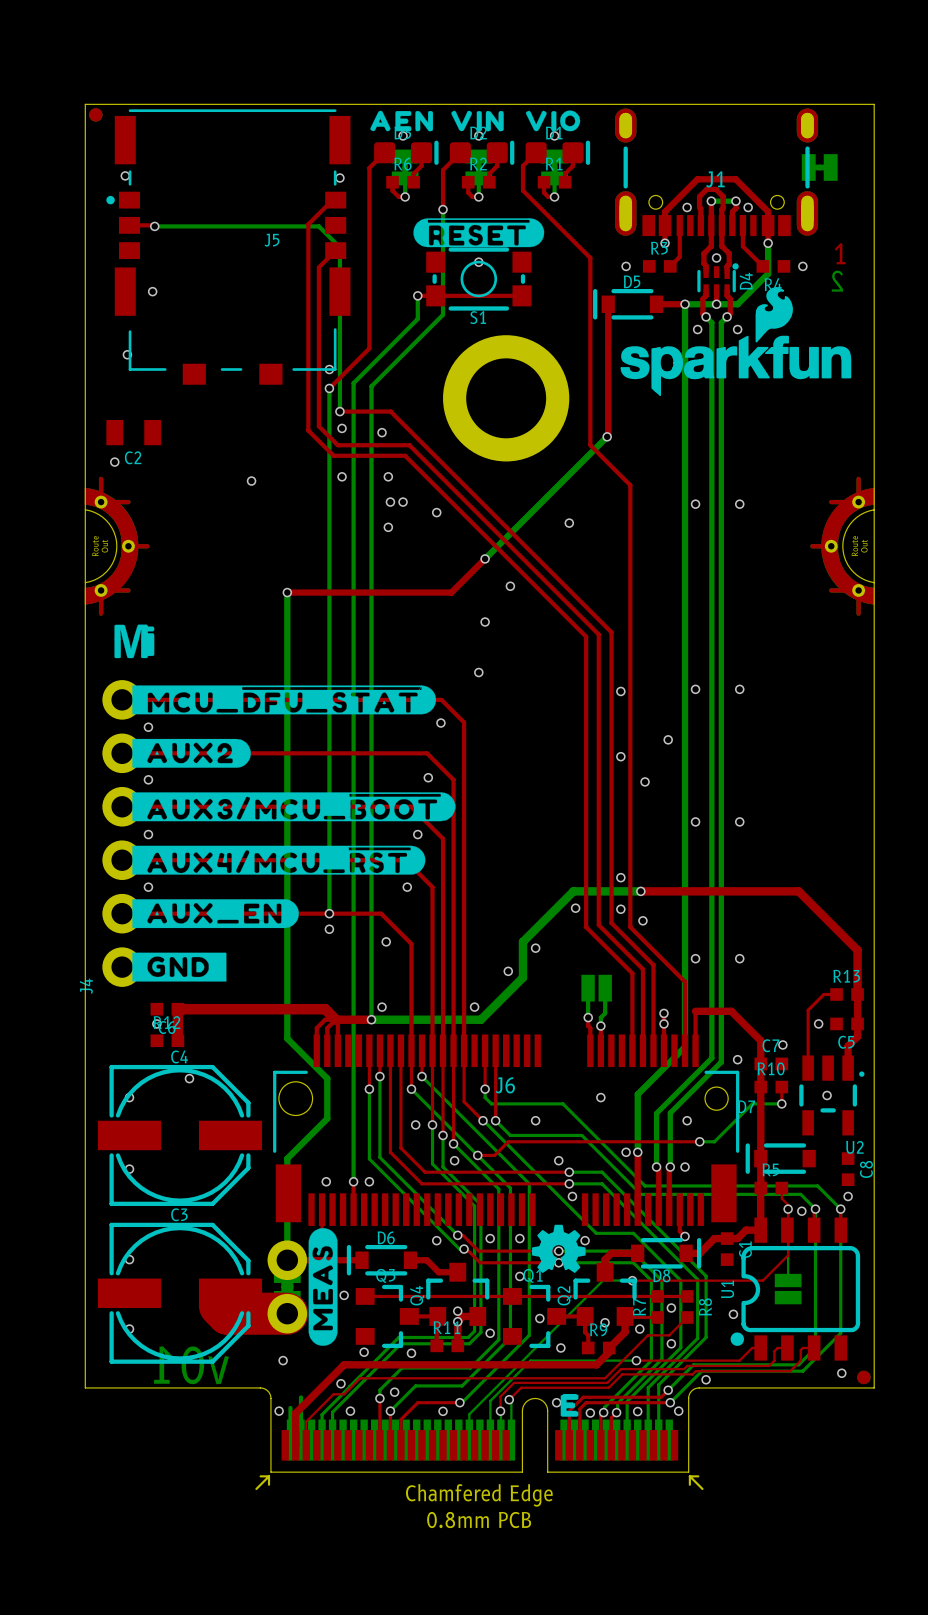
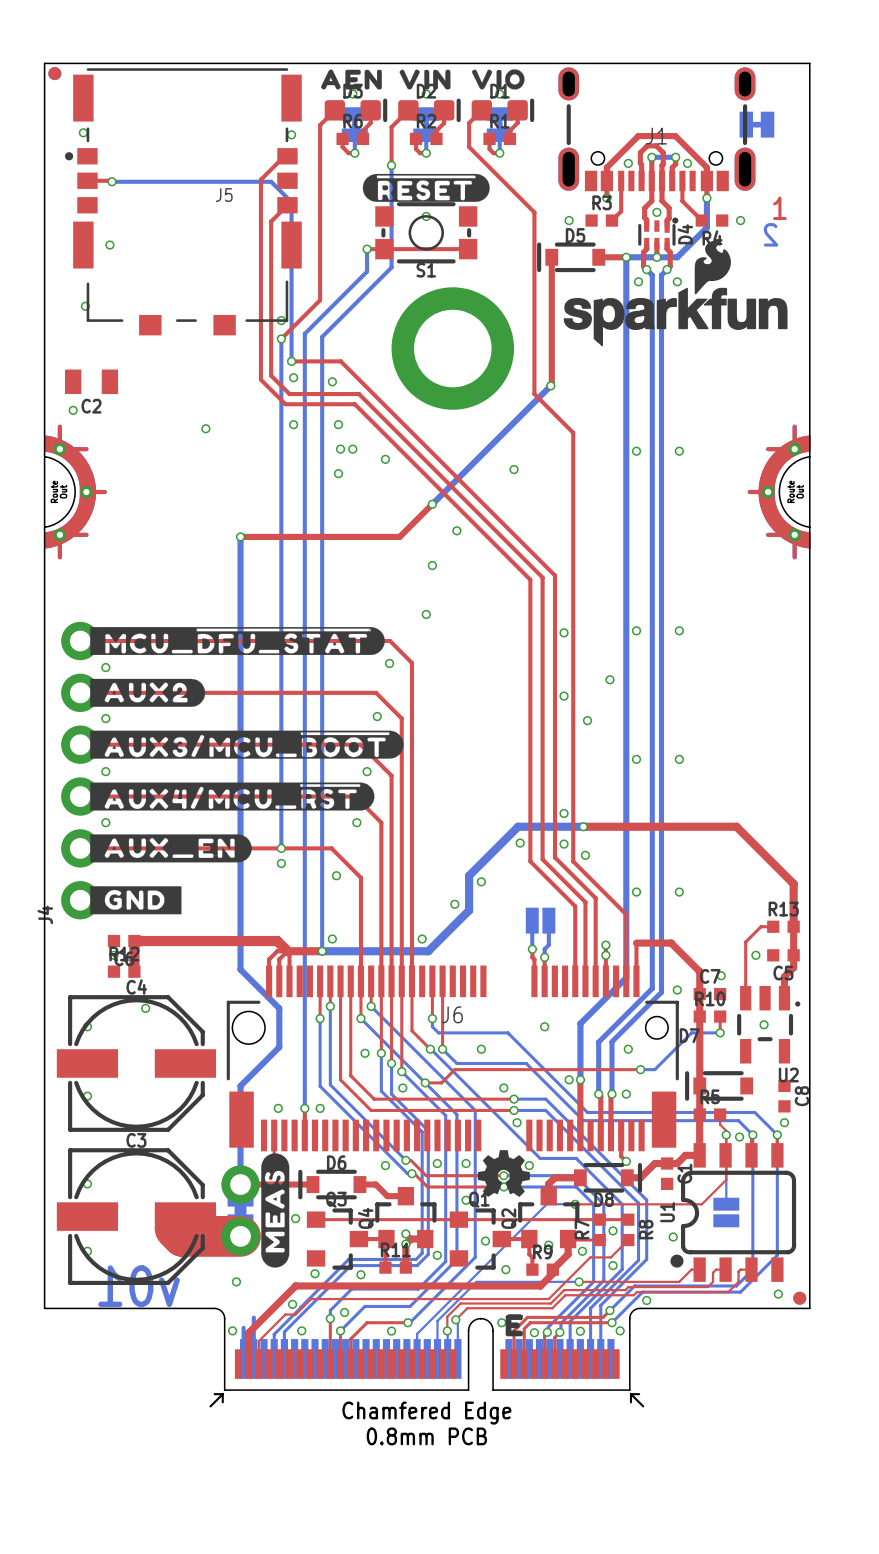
drawing: [114, 624, 155, 659] -> none

